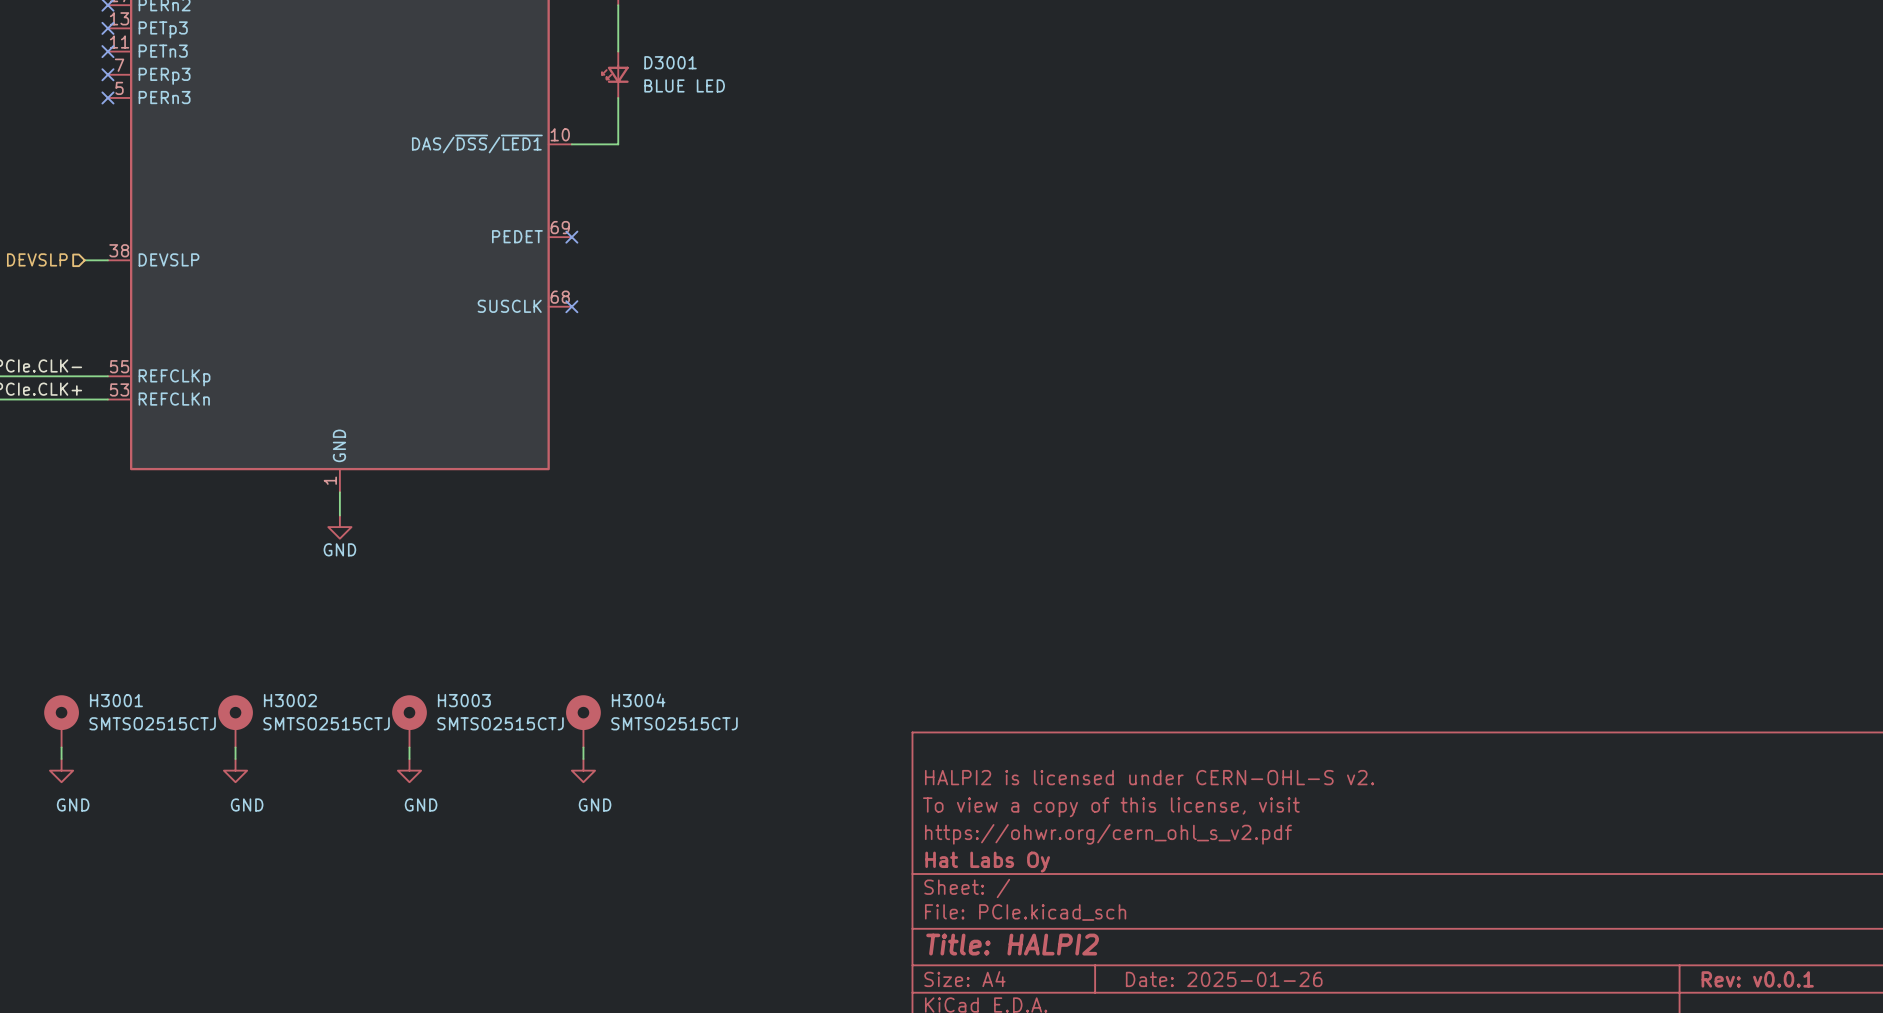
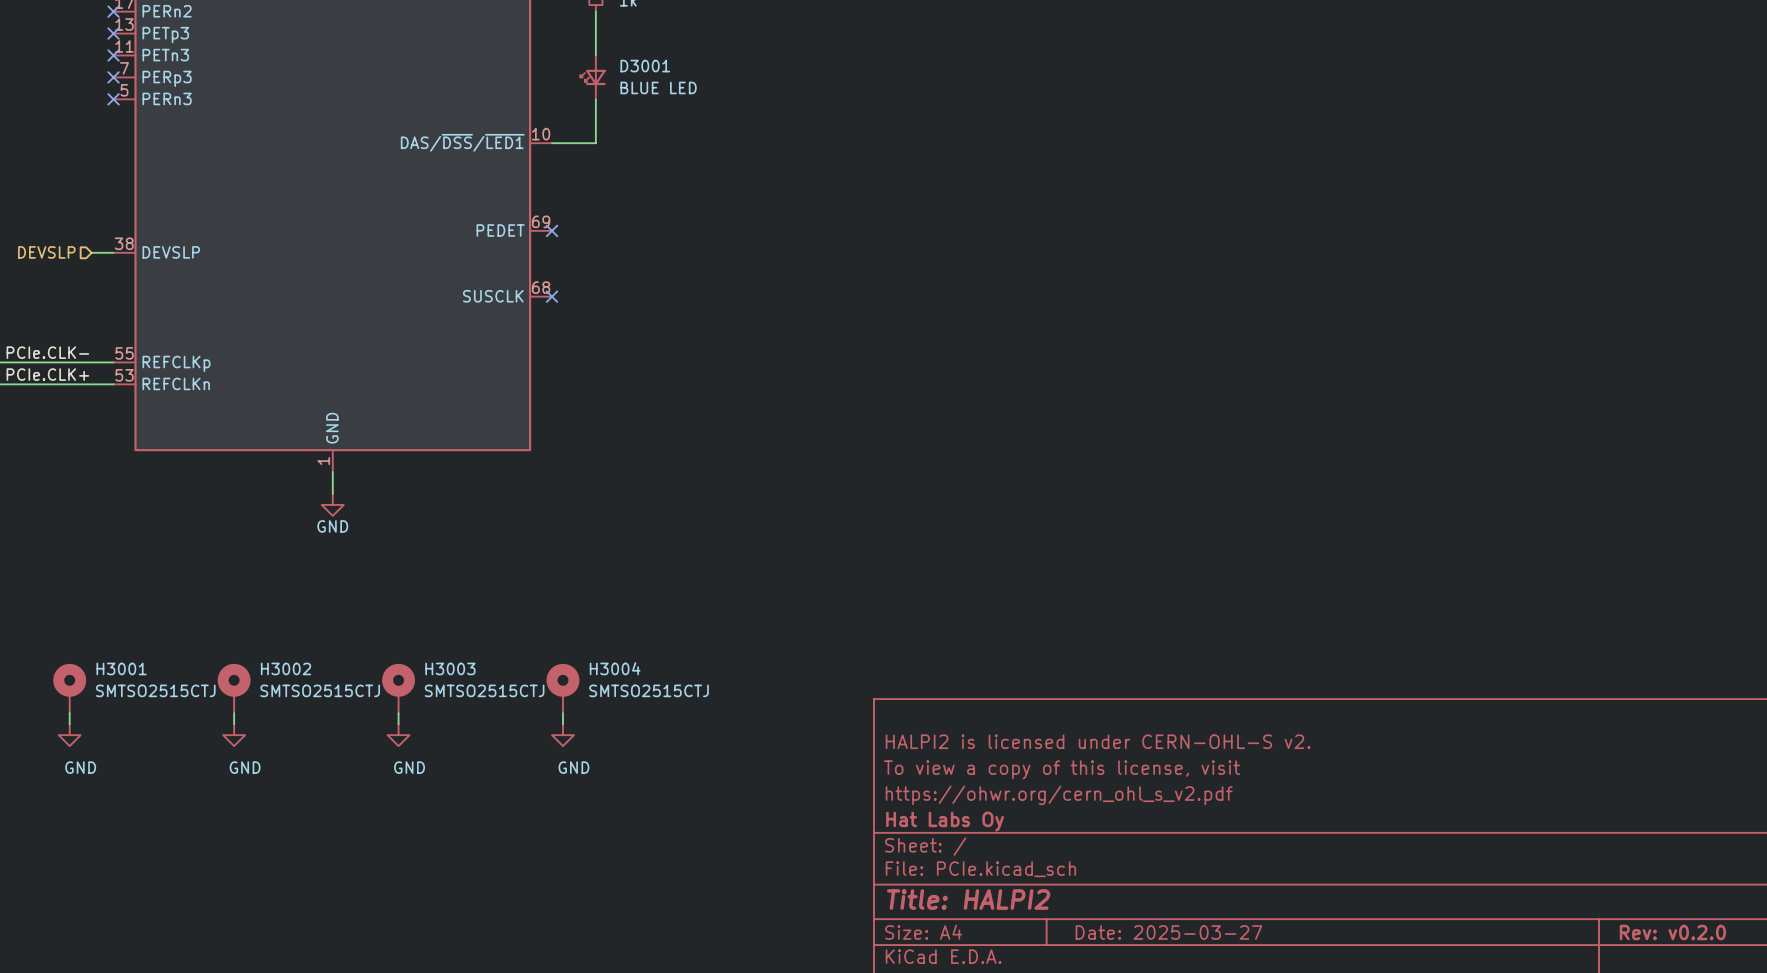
title block: Date: 2025-01-26 (1224, 979) -> Date: 2025-03-27 (1168, 932)
title block: Rev: v0.0.1 (1757, 979) -> Rev: v0.2.0 (1672, 932)

